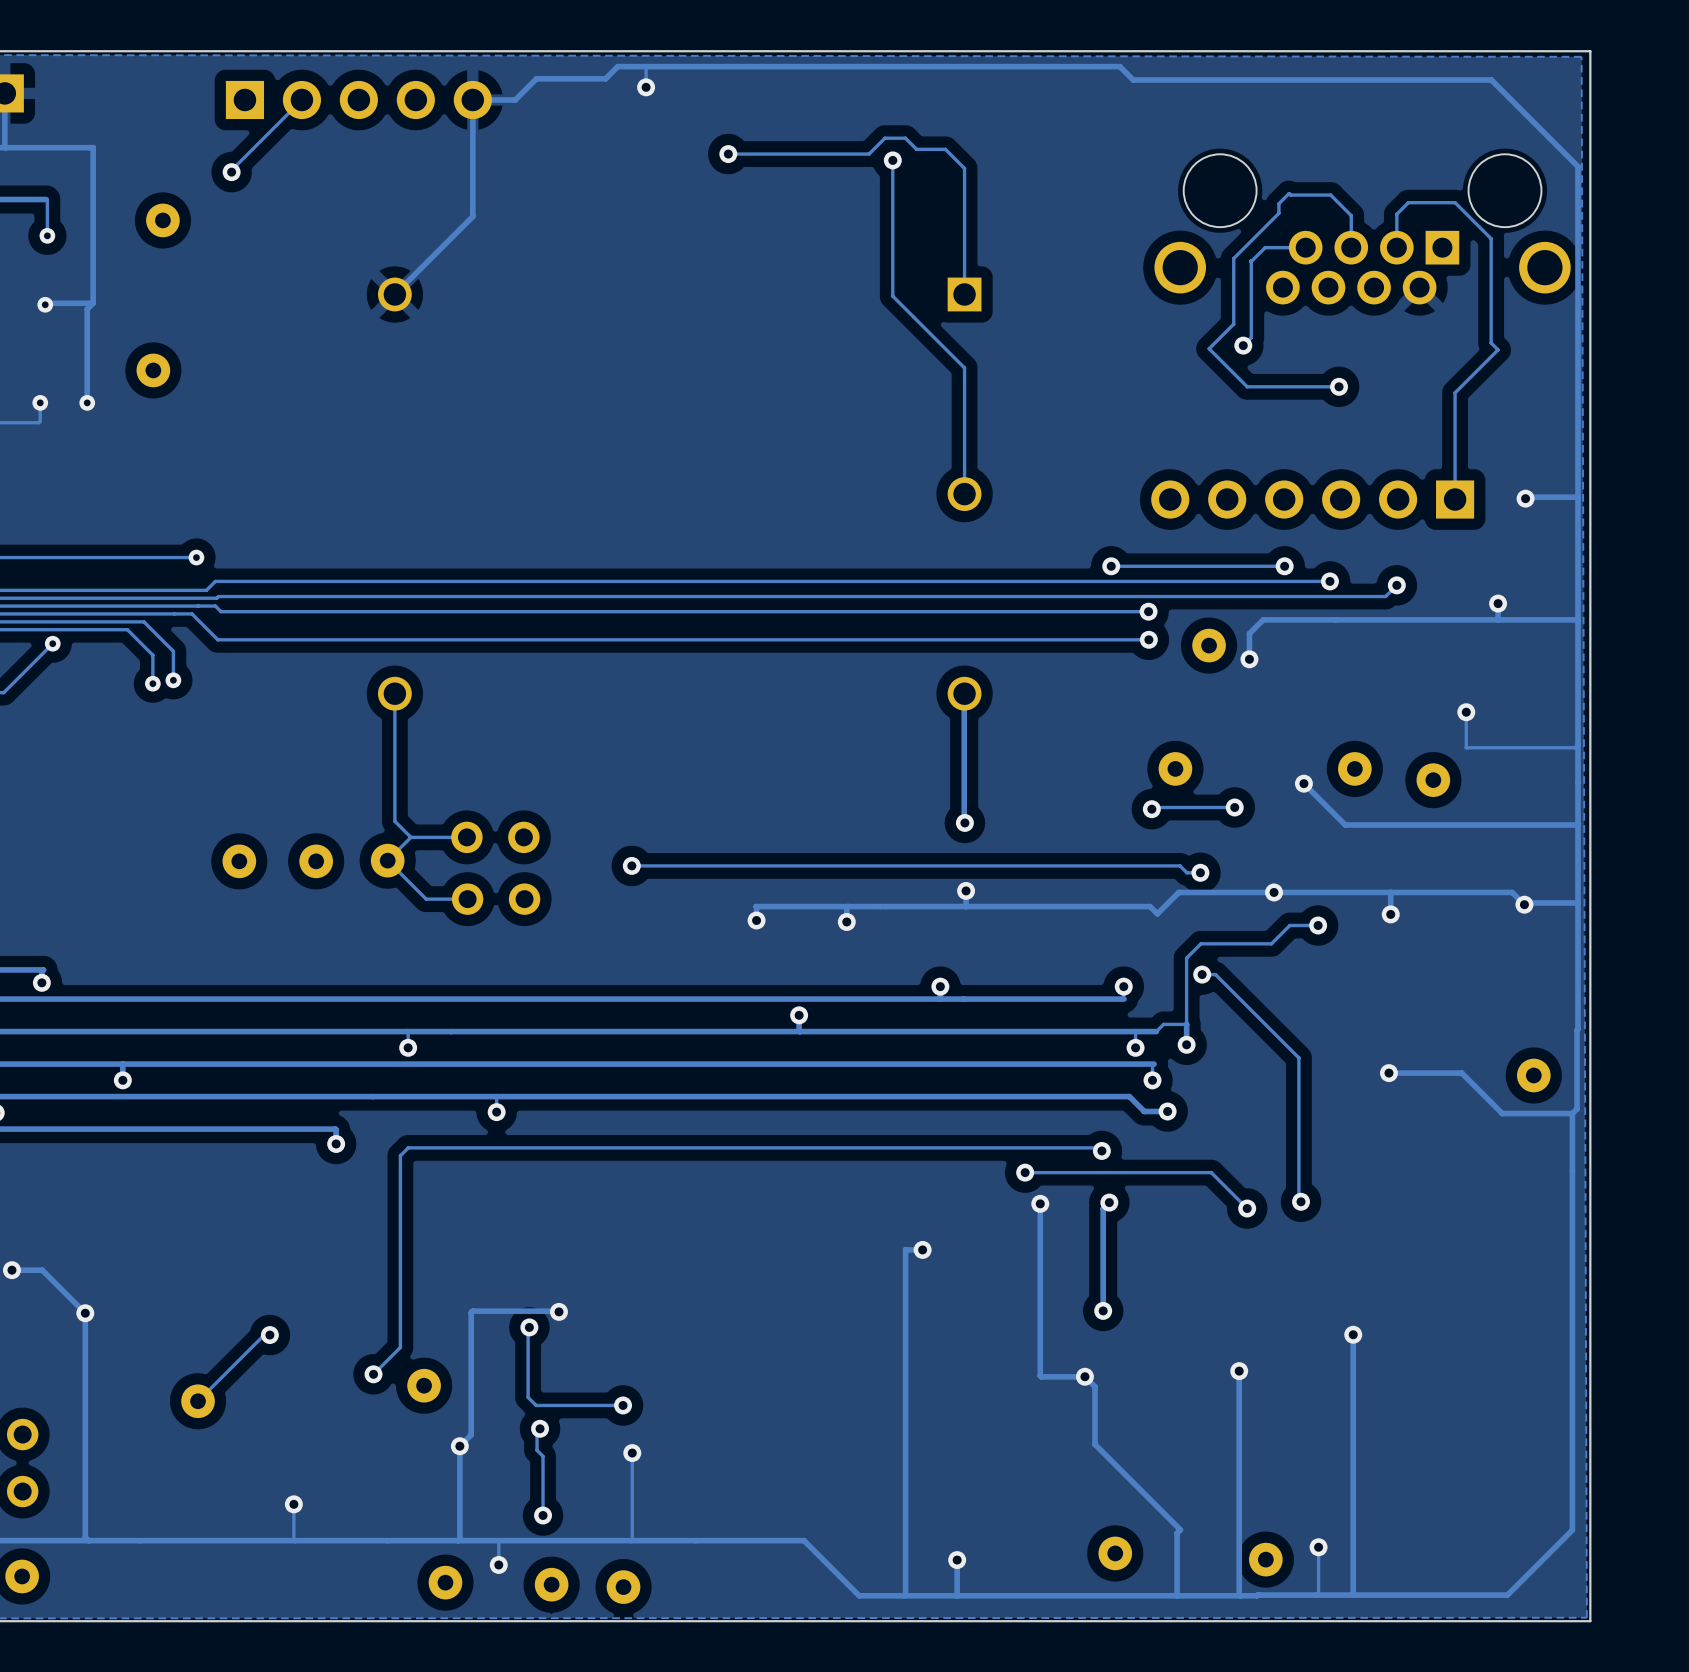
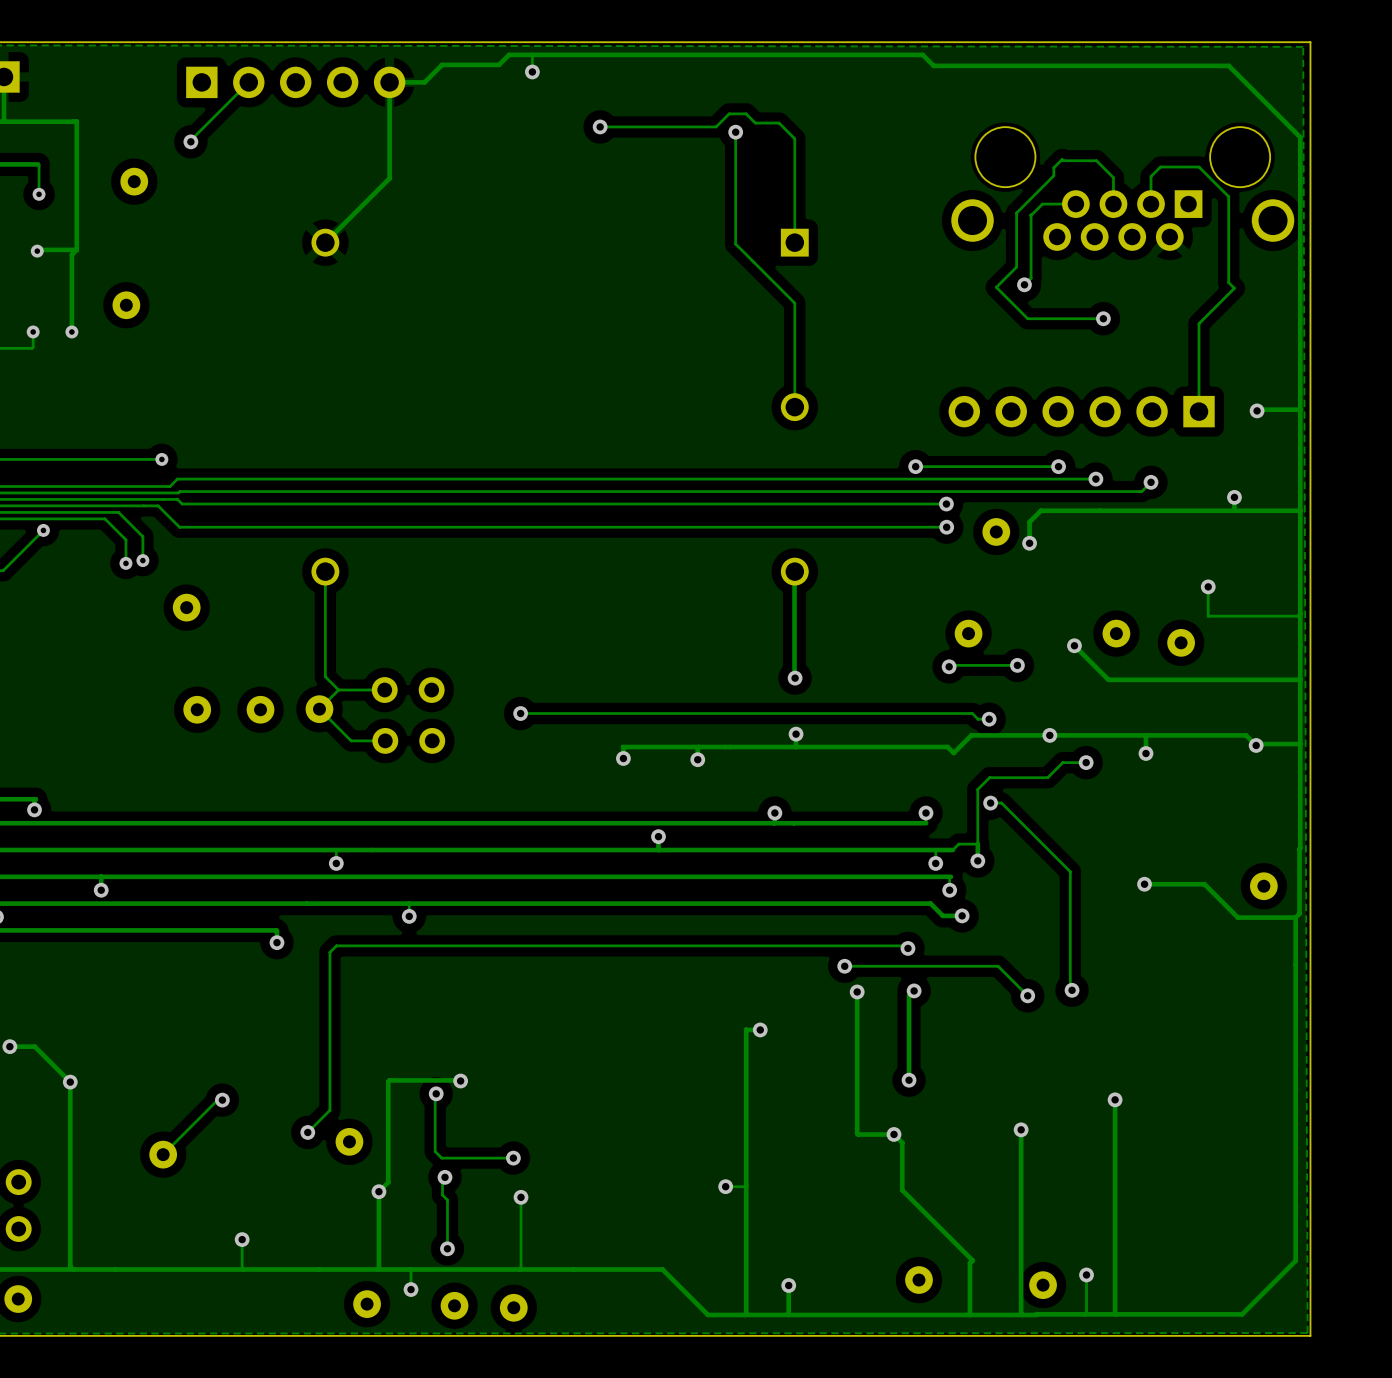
part: none -> (186, 607)
track: none -> (746, 1185) (725, 1186)
via: none -> (725, 1186)

